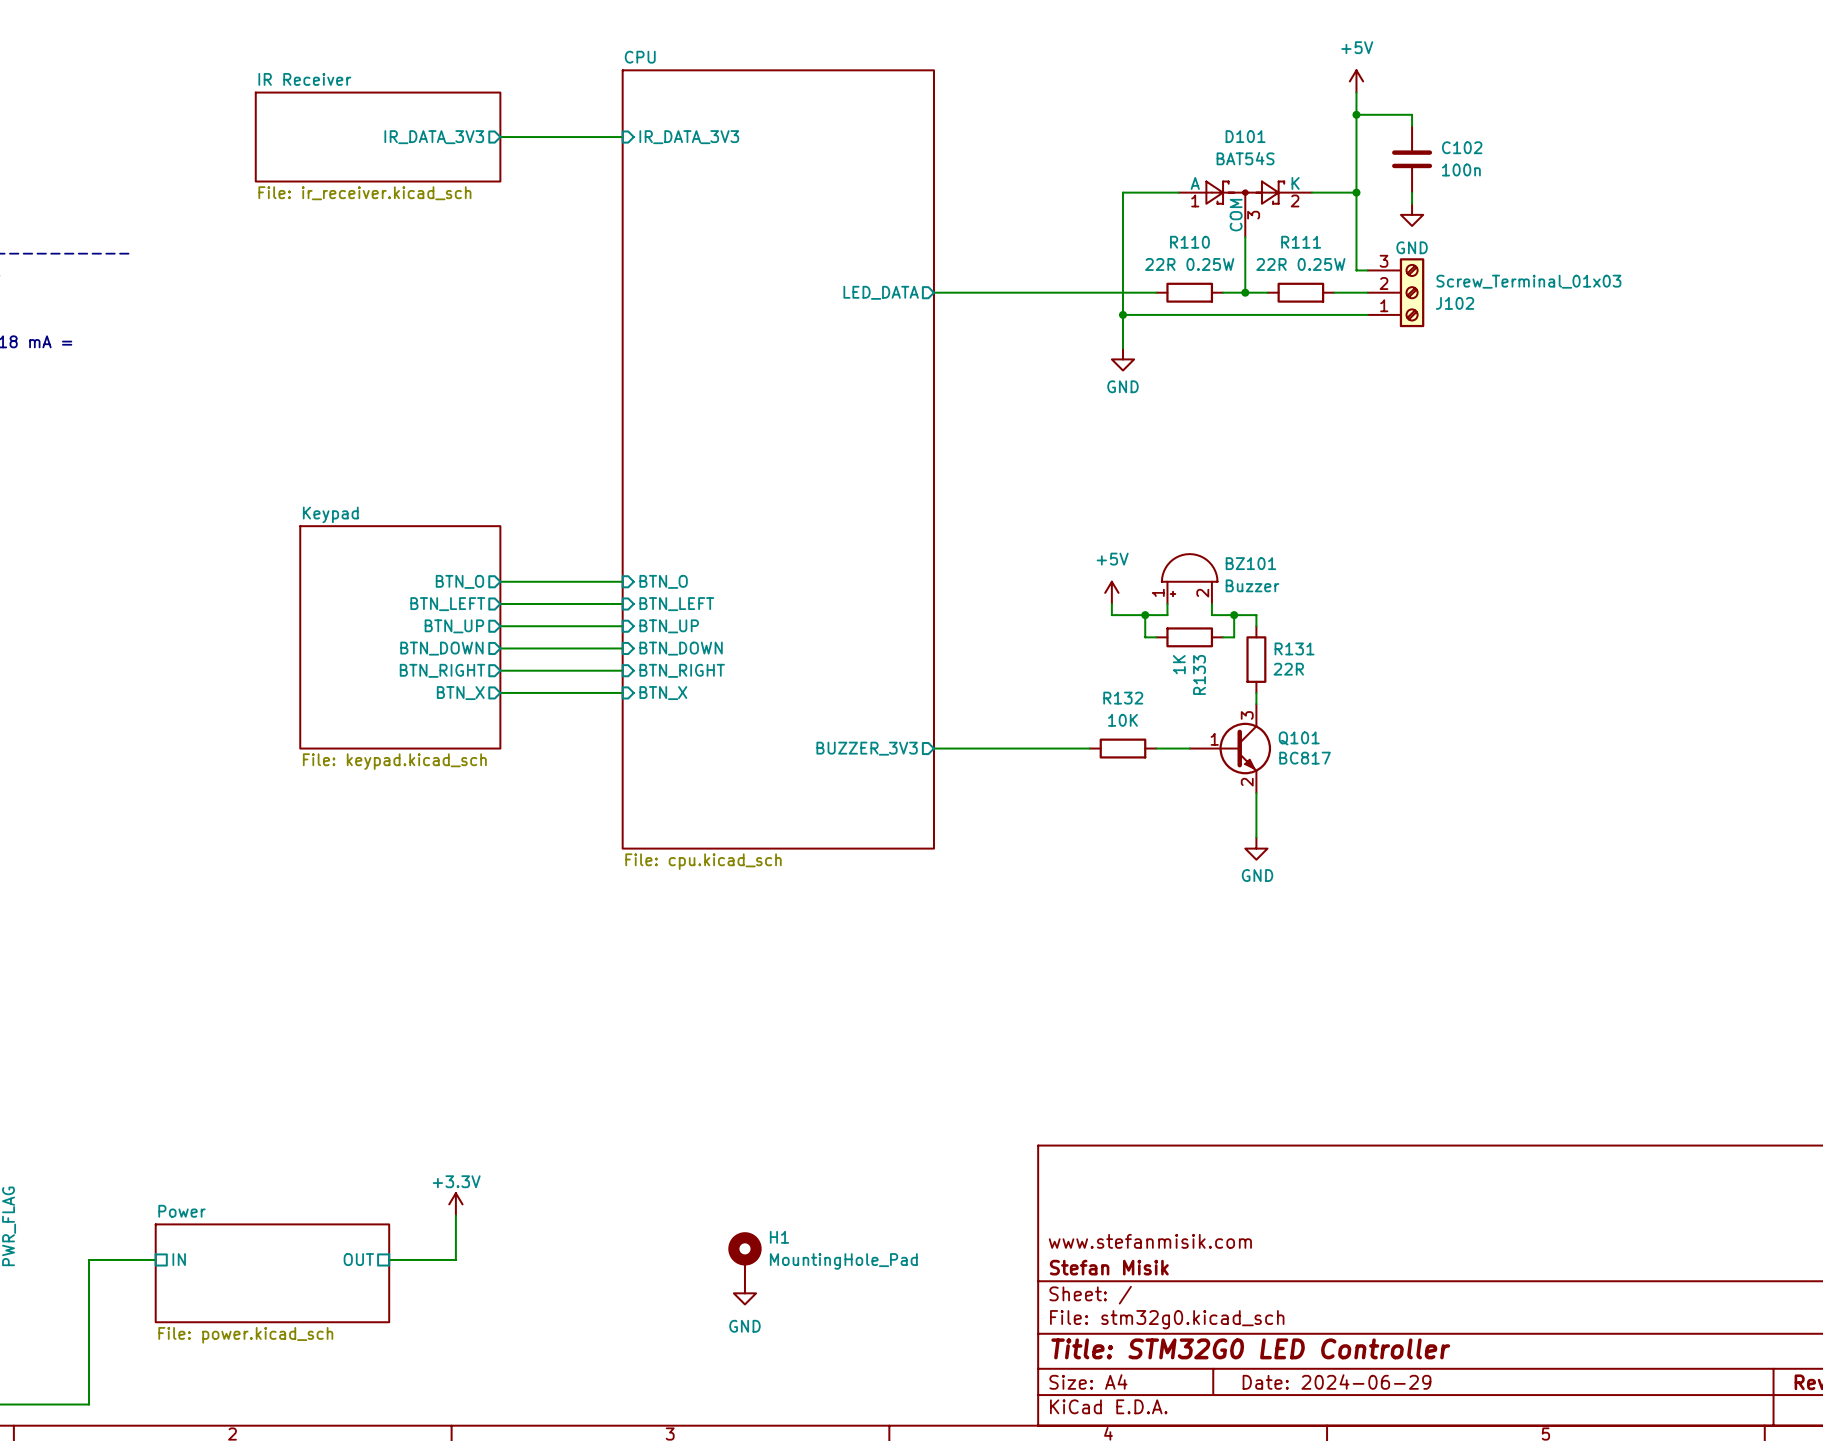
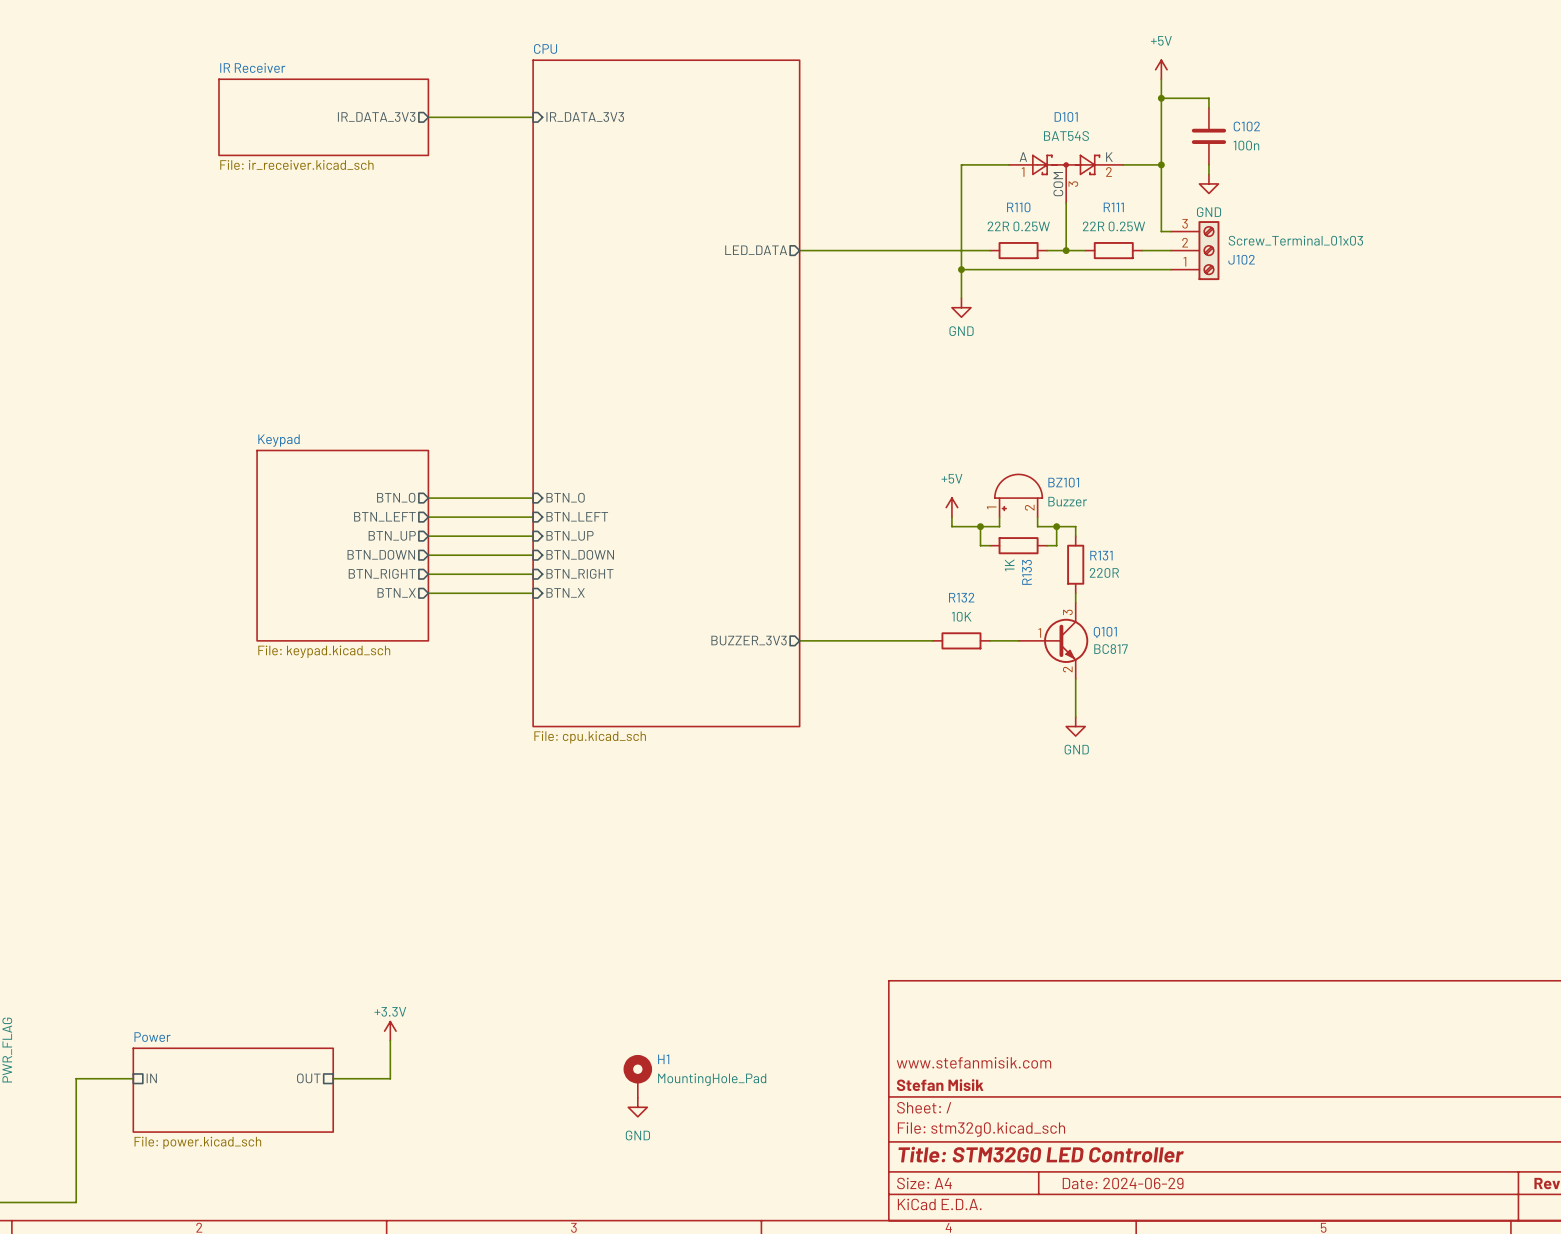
R131 value: 22R (1288, 669) -> 220R (1104, 572)

